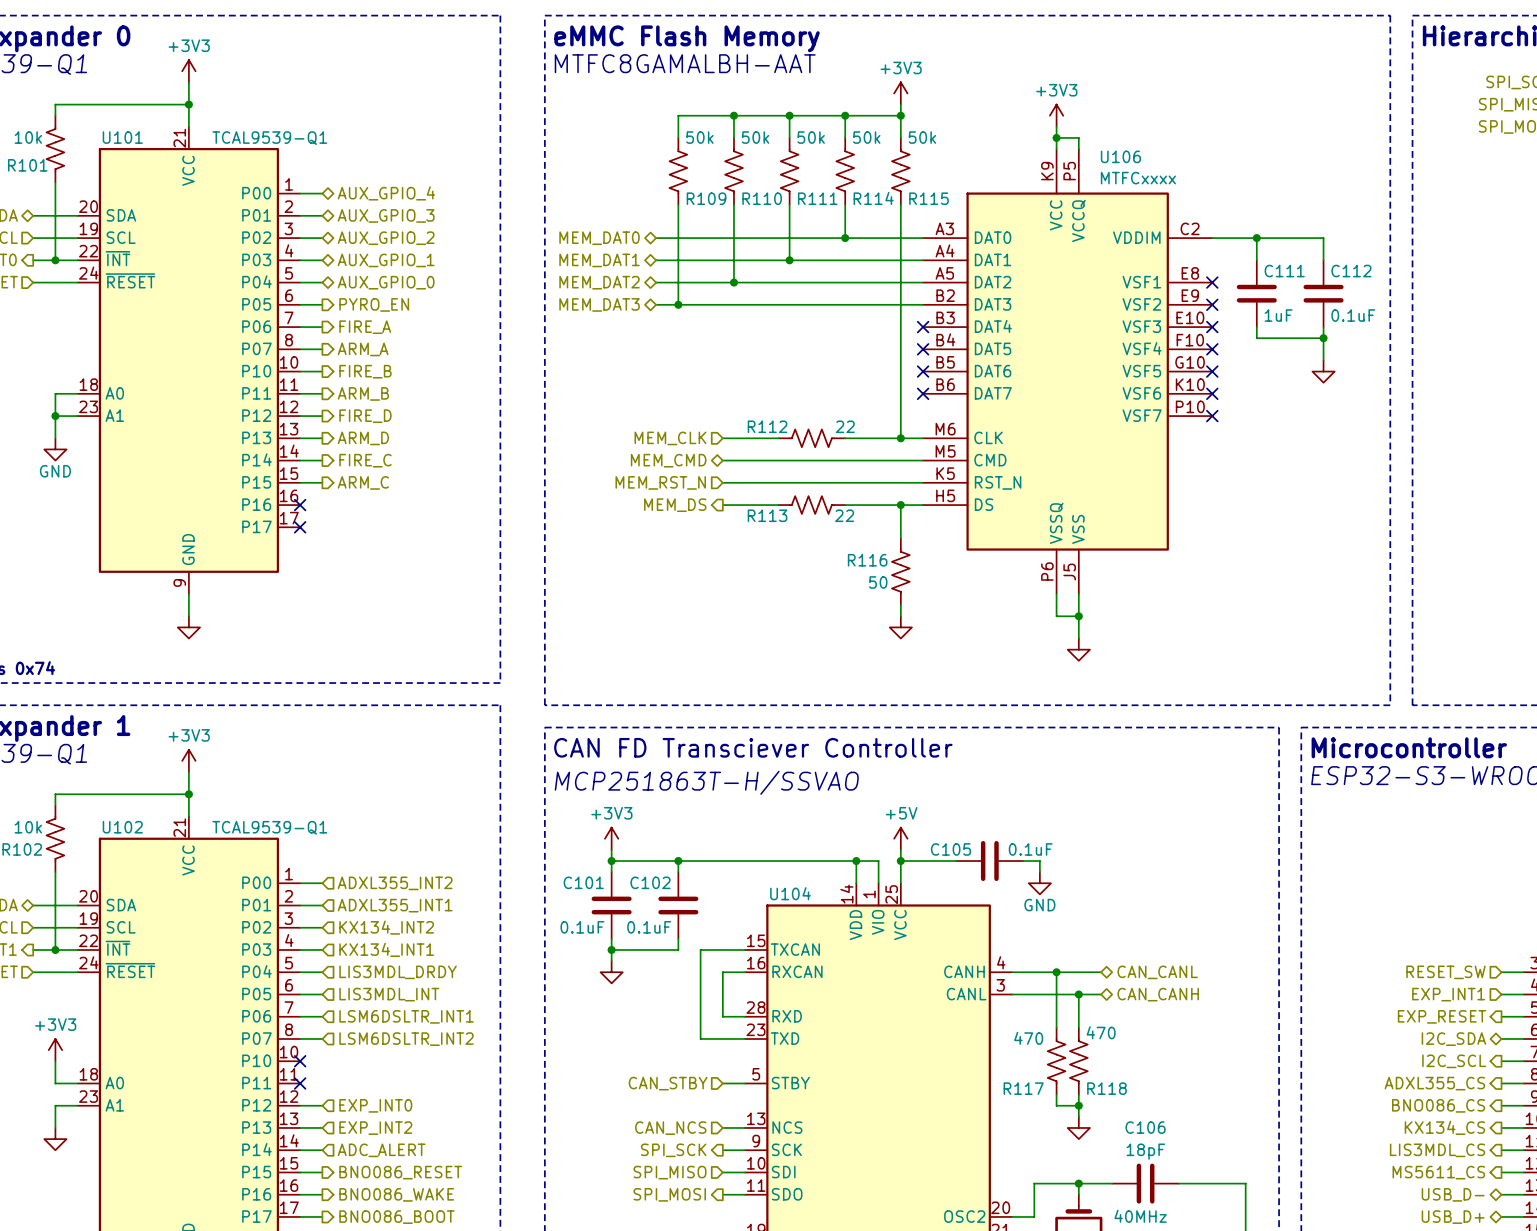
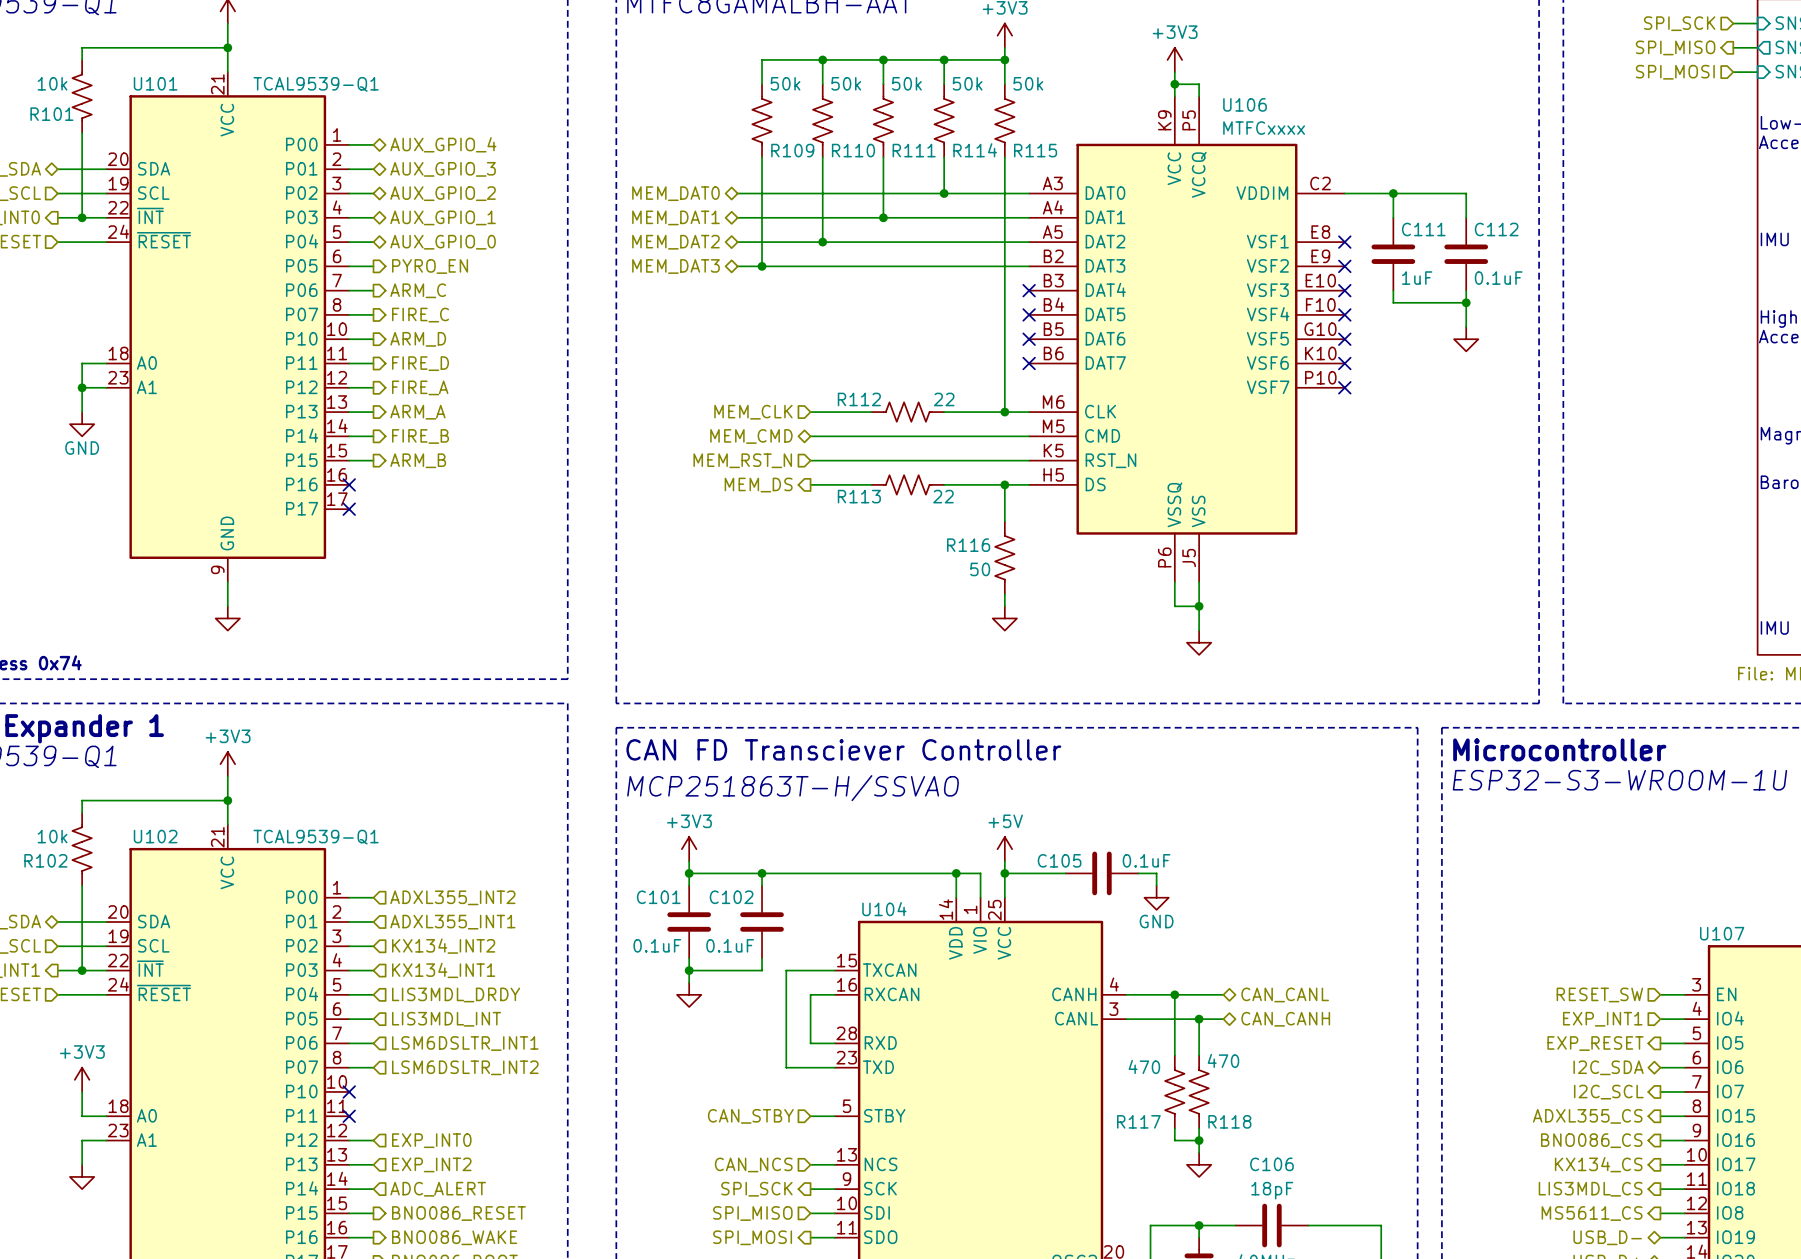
hierarchical label: FIRE_A (365, 327) -> ARM_C (418, 290)
hierarchical label: ARM_A (363, 349) -> FIRE_C (420, 315)
hierarchical label: FIRE_B (365, 371) -> ARM_D (418, 339)
hierarchical label: ARM_B (363, 393) -> FIRE_D (420, 363)
hierarchical label: FIRE_D (365, 416) -> FIRE_A (420, 387)
hierarchical label: ARM_D (363, 438) -> ARM_A (417, 412)
hierarchical label: FIRE_C (365, 460) -> FIRE_B (420, 436)
hierarchical label: ARM_C (363, 482) -> ARM_B (418, 460)

